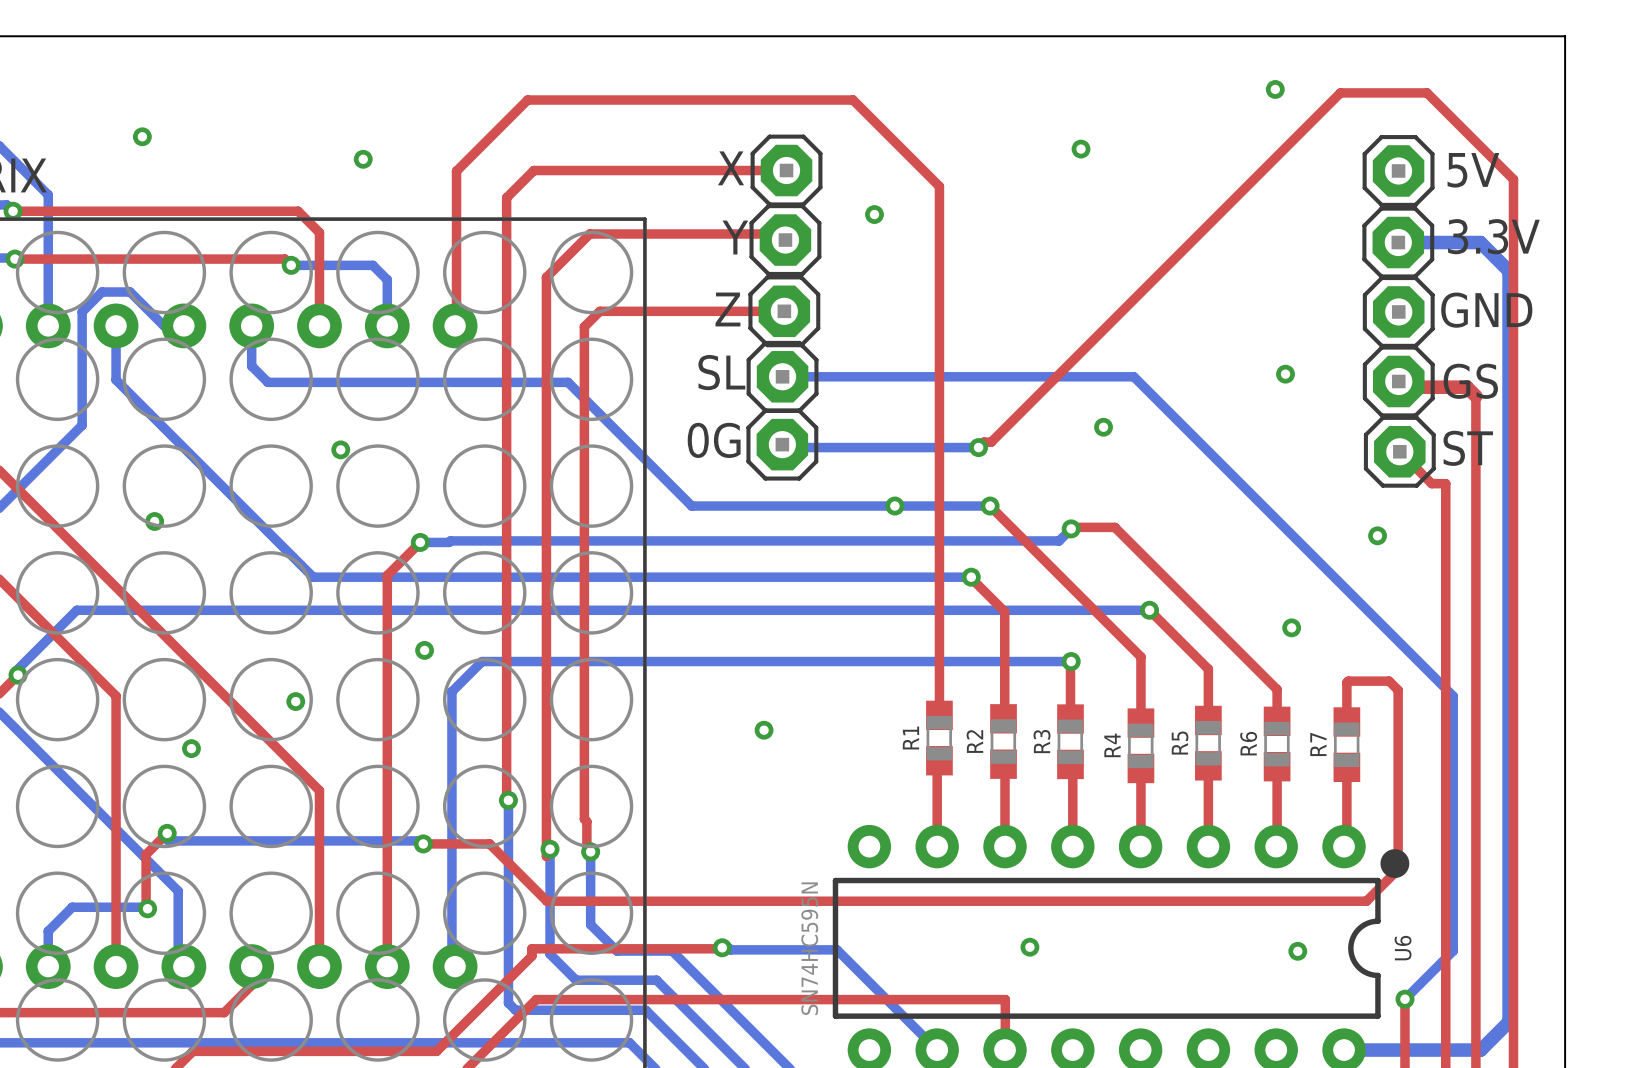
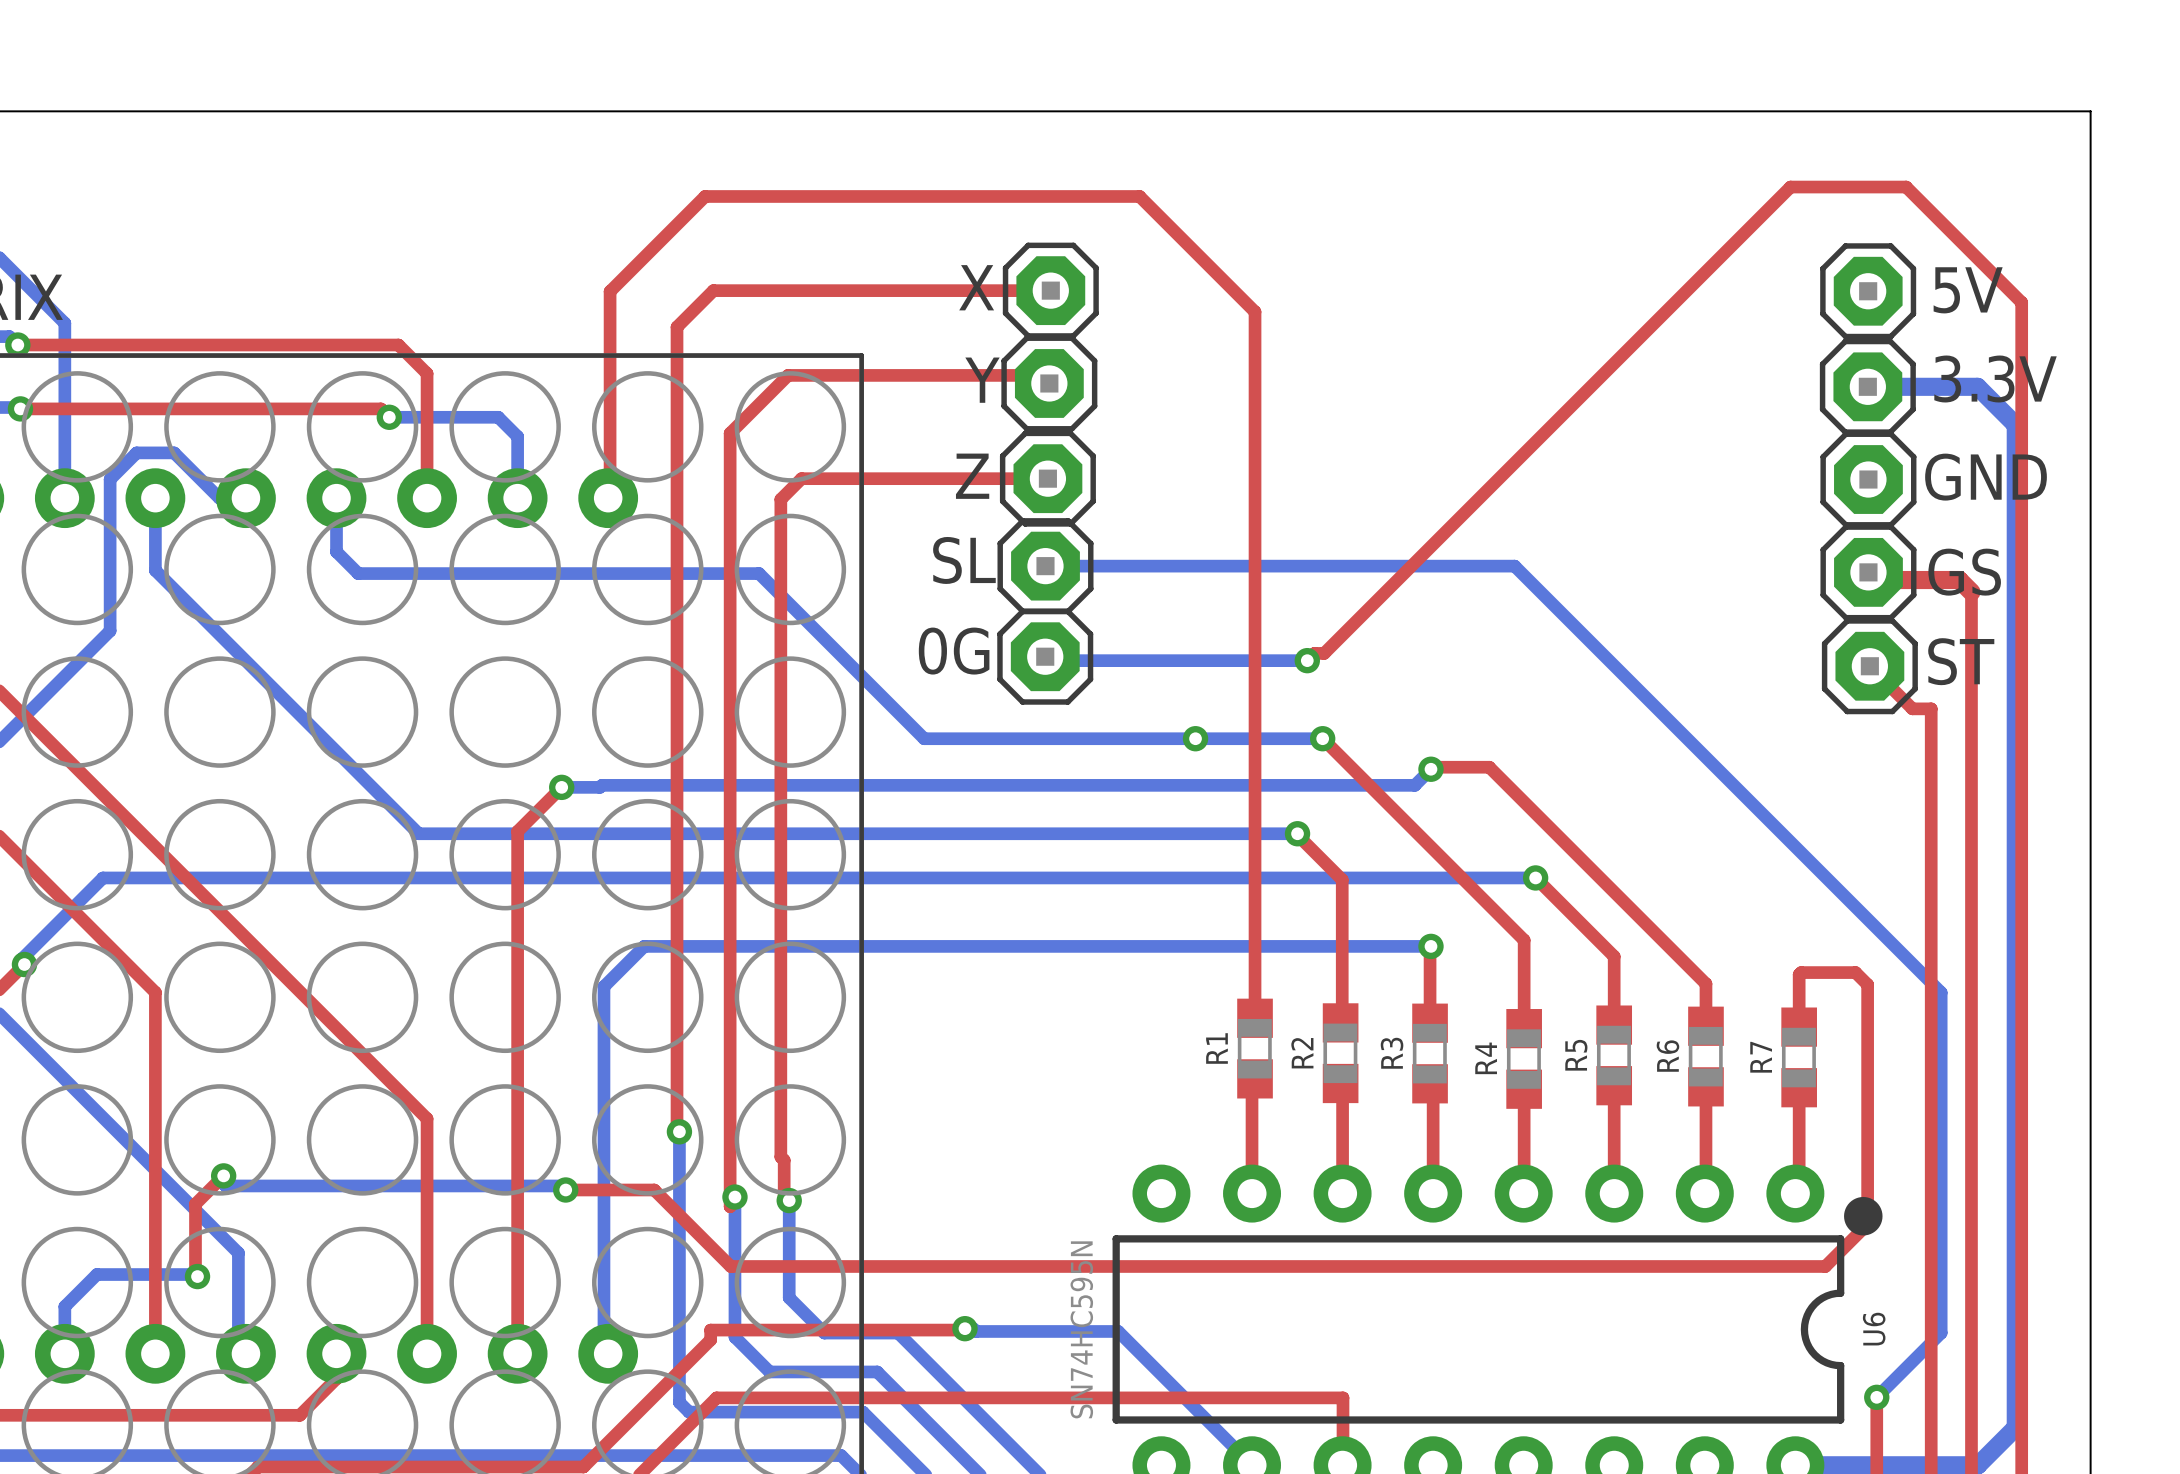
via: (1275, 89) -> none
via: (142, 136) -> none
via: (1081, 149) -> none
via: (363, 159) -> none
via: (874, 214) -> none
via: (1285, 374) -> none
via: (1103, 427) -> none
via: (340, 449) -> none
via: (154, 521) -> none
via: (1377, 535) -> none
via: (1291, 627) -> none
via: (424, 650) -> none
via: (295, 701) -> none
via: (764, 730) -> none
via: (191, 748) -> none
via: (1029, 947) -> none
via: (1297, 951) -> none

